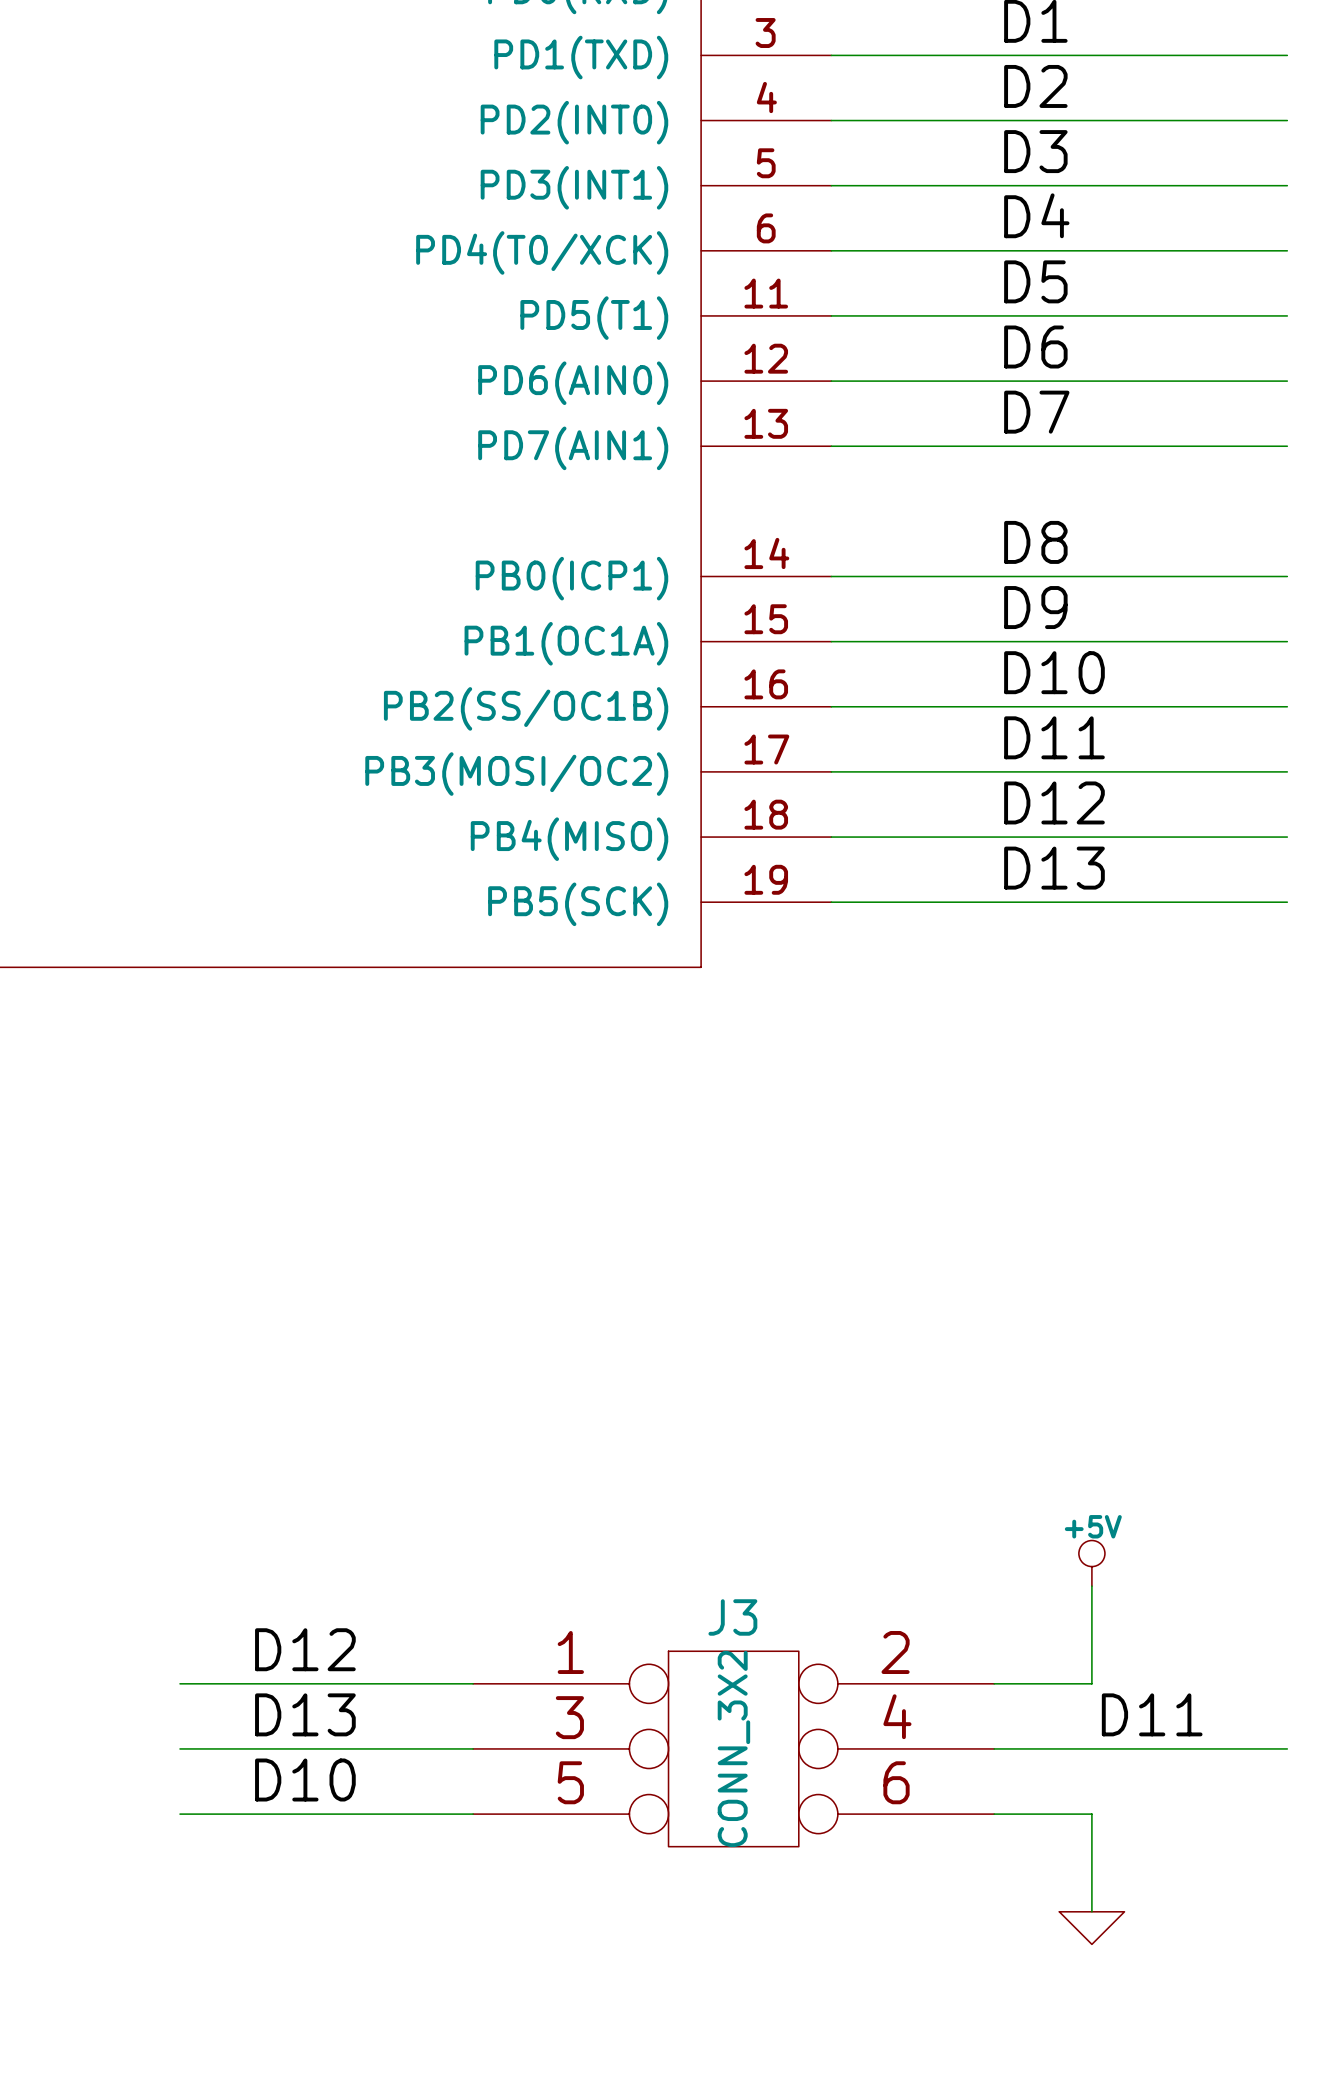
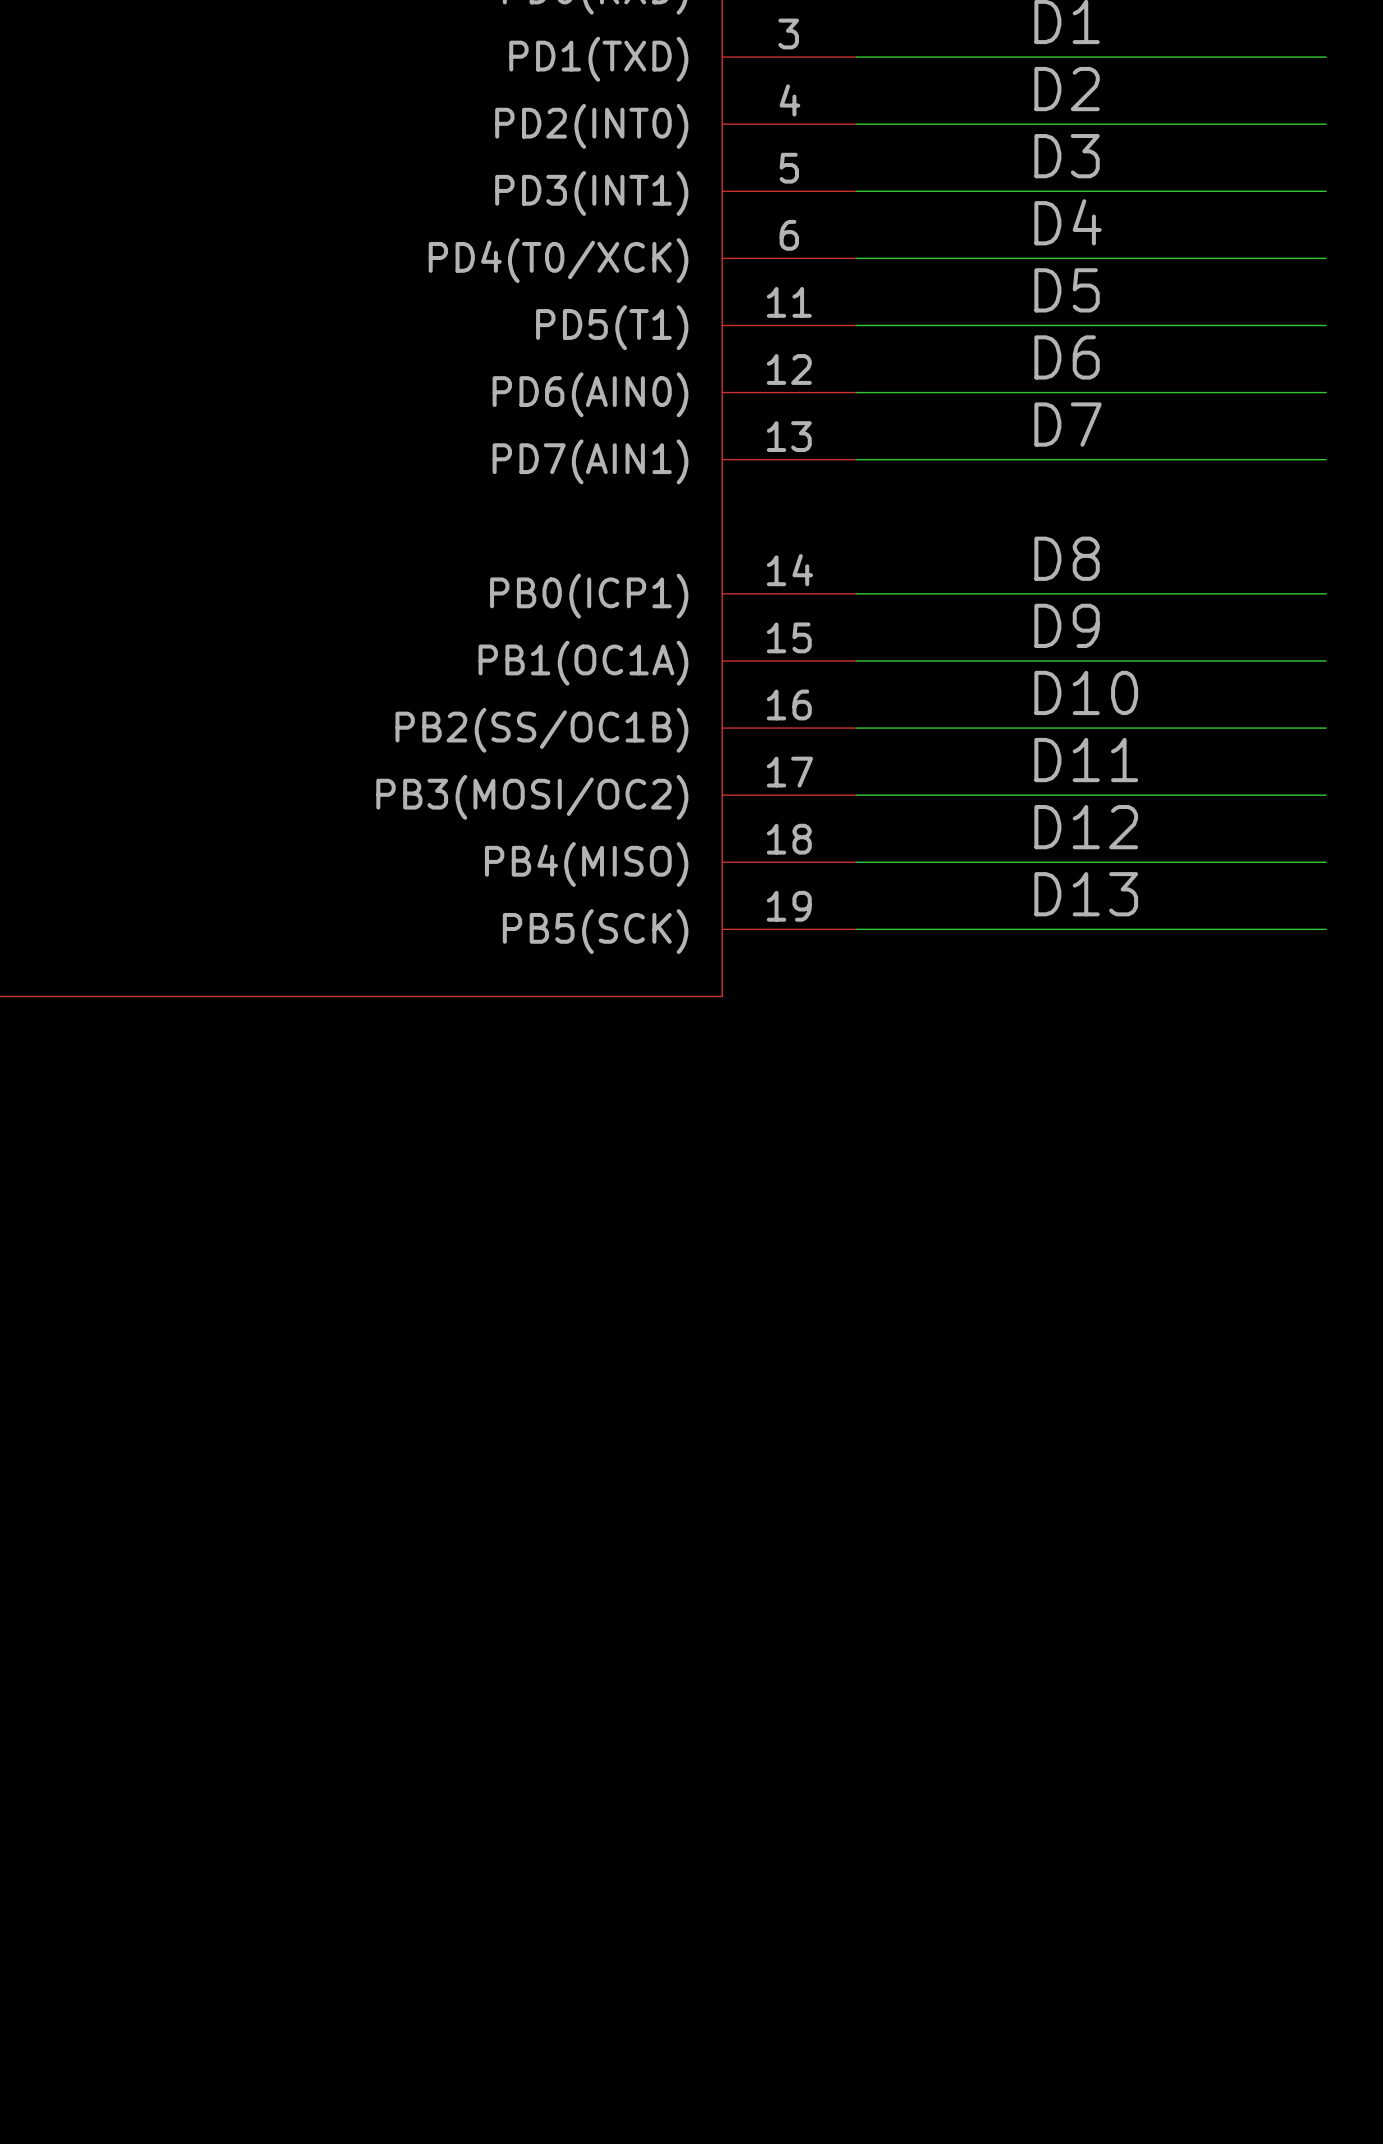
power symbol: +5V (1091, 1563) -> none
wire: (1091, 1586) (1091, 1683) (994, 1683) -> none
label: D12 (305, 1649) -> none
wire: (180, 1683) (473, 1683) -> none
label: D13 (305, 1714) -> none
label: D11 (1152, 1714) -> none
wire: (180, 1748) (473, 1748) -> none
J3: CONN_3X2 (733, 1748) -> none
wire: (994, 1748) (1287, 1748) -> none
label: D10 (305, 1780) -> none
wire: (180, 1814) (473, 1814) -> none
wire: (994, 1814) (1091, 1814) (1091, 1911) -> none
power symbol: (1091, 1928) -> none

